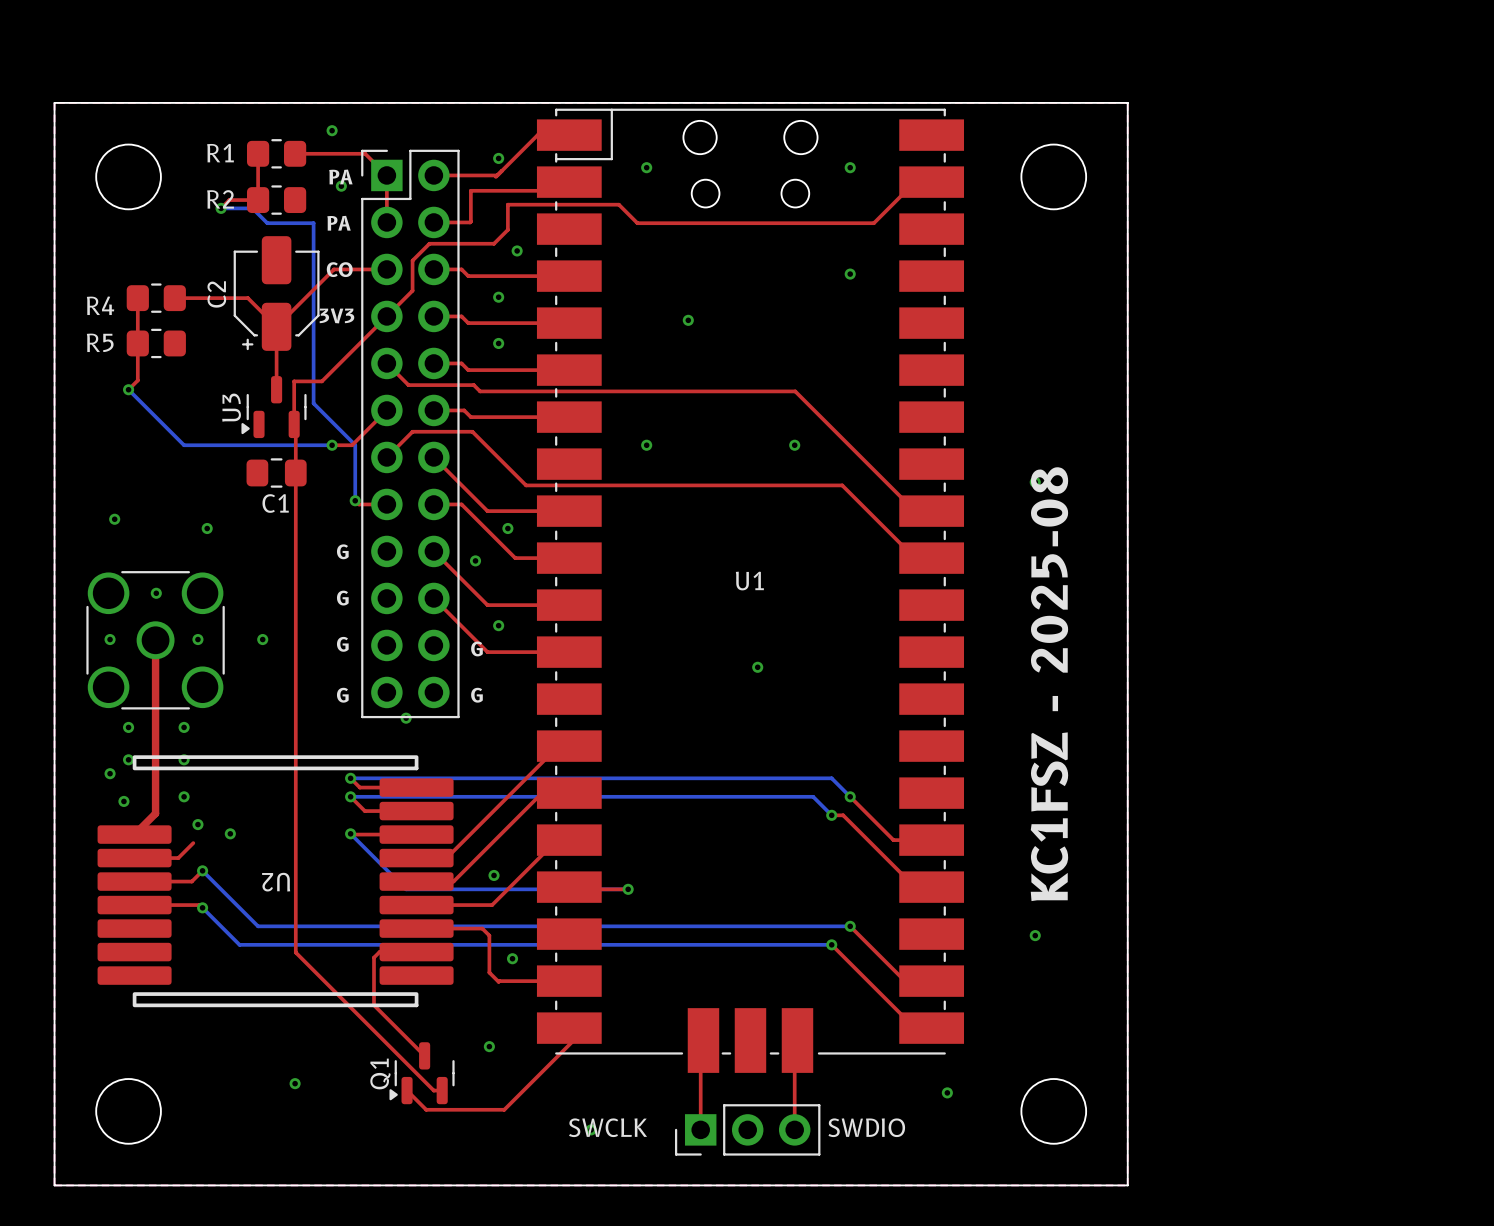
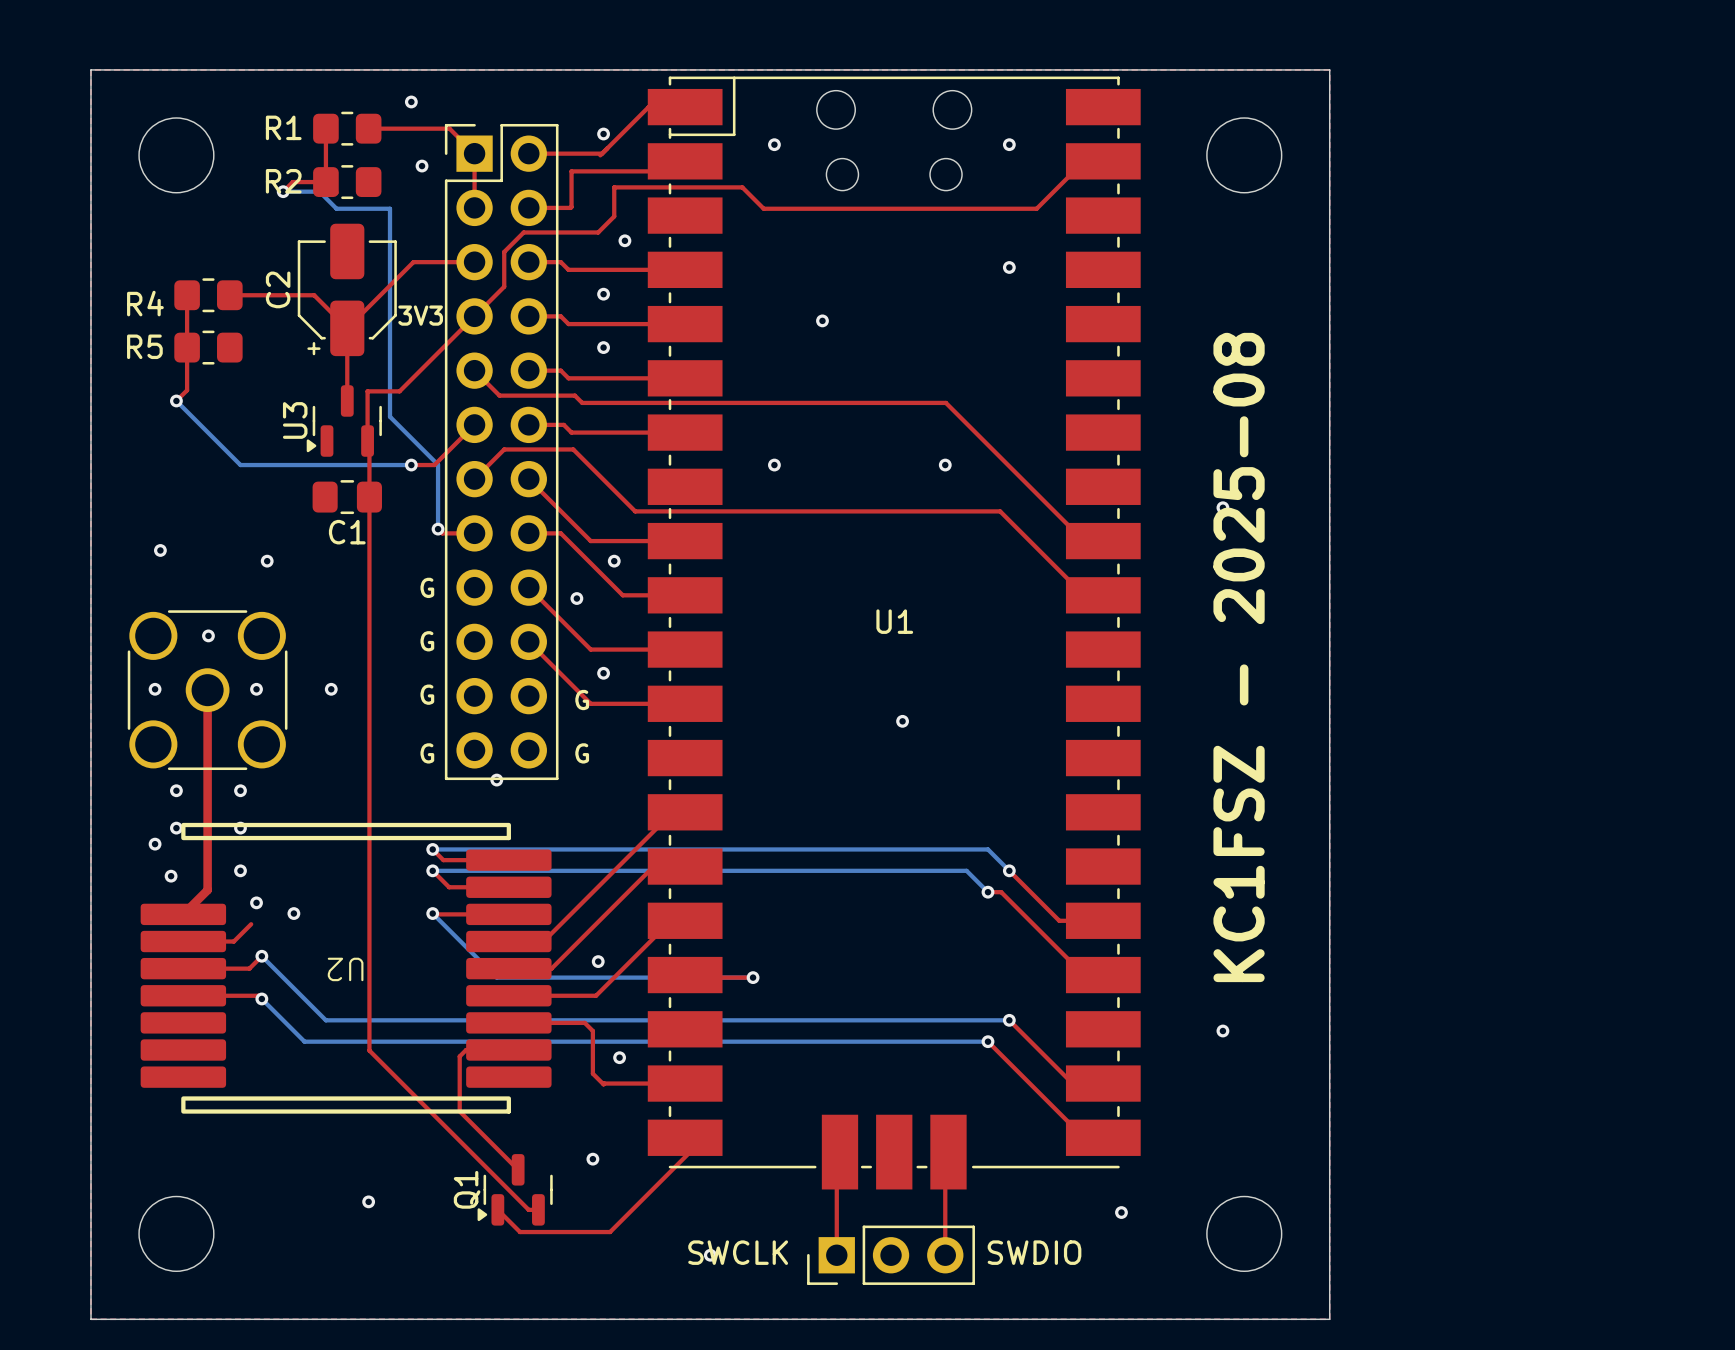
text: PA (340, 176) -> none
text: PA (339, 223) -> none
text: CO (339, 269) -> none

